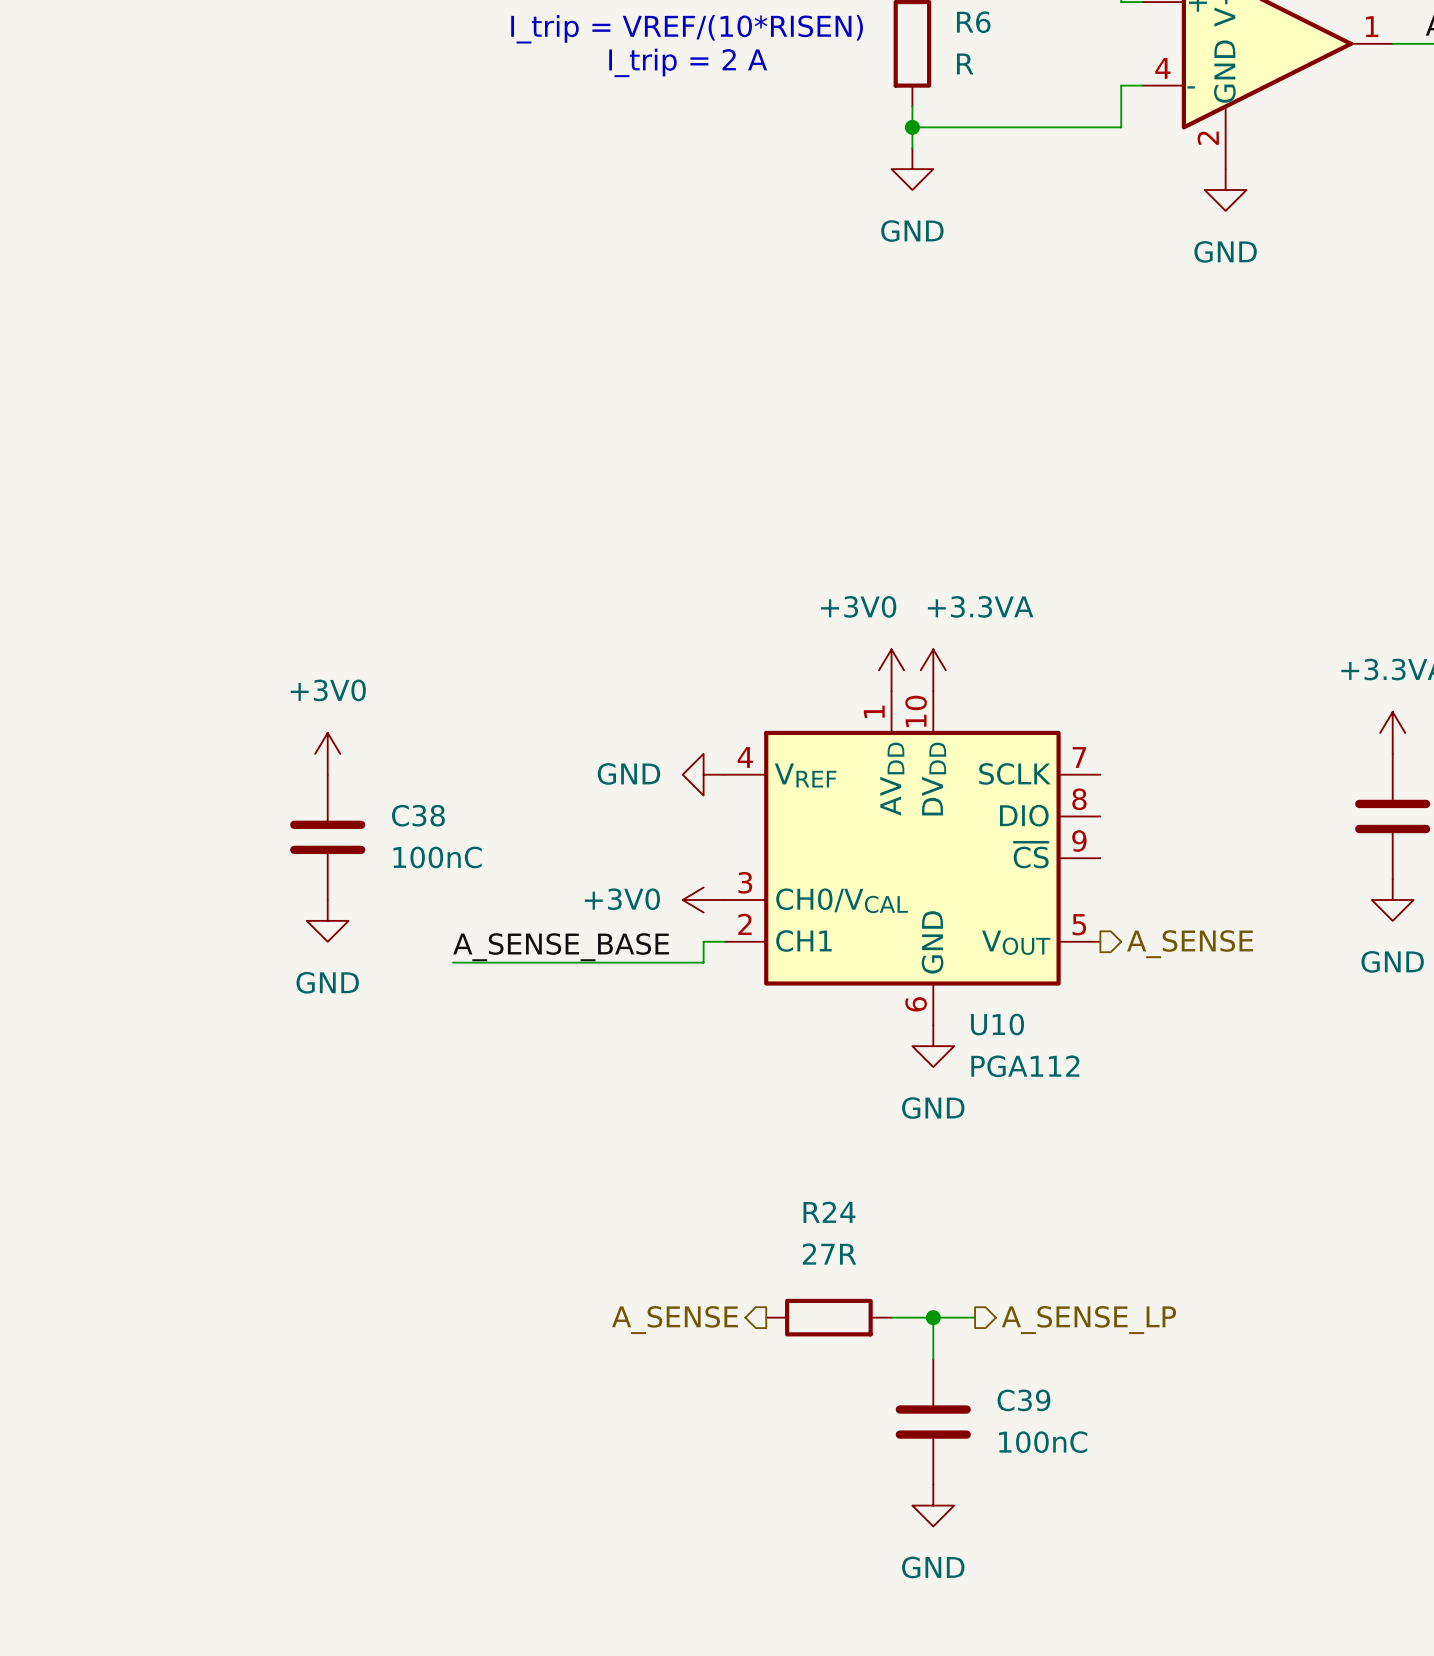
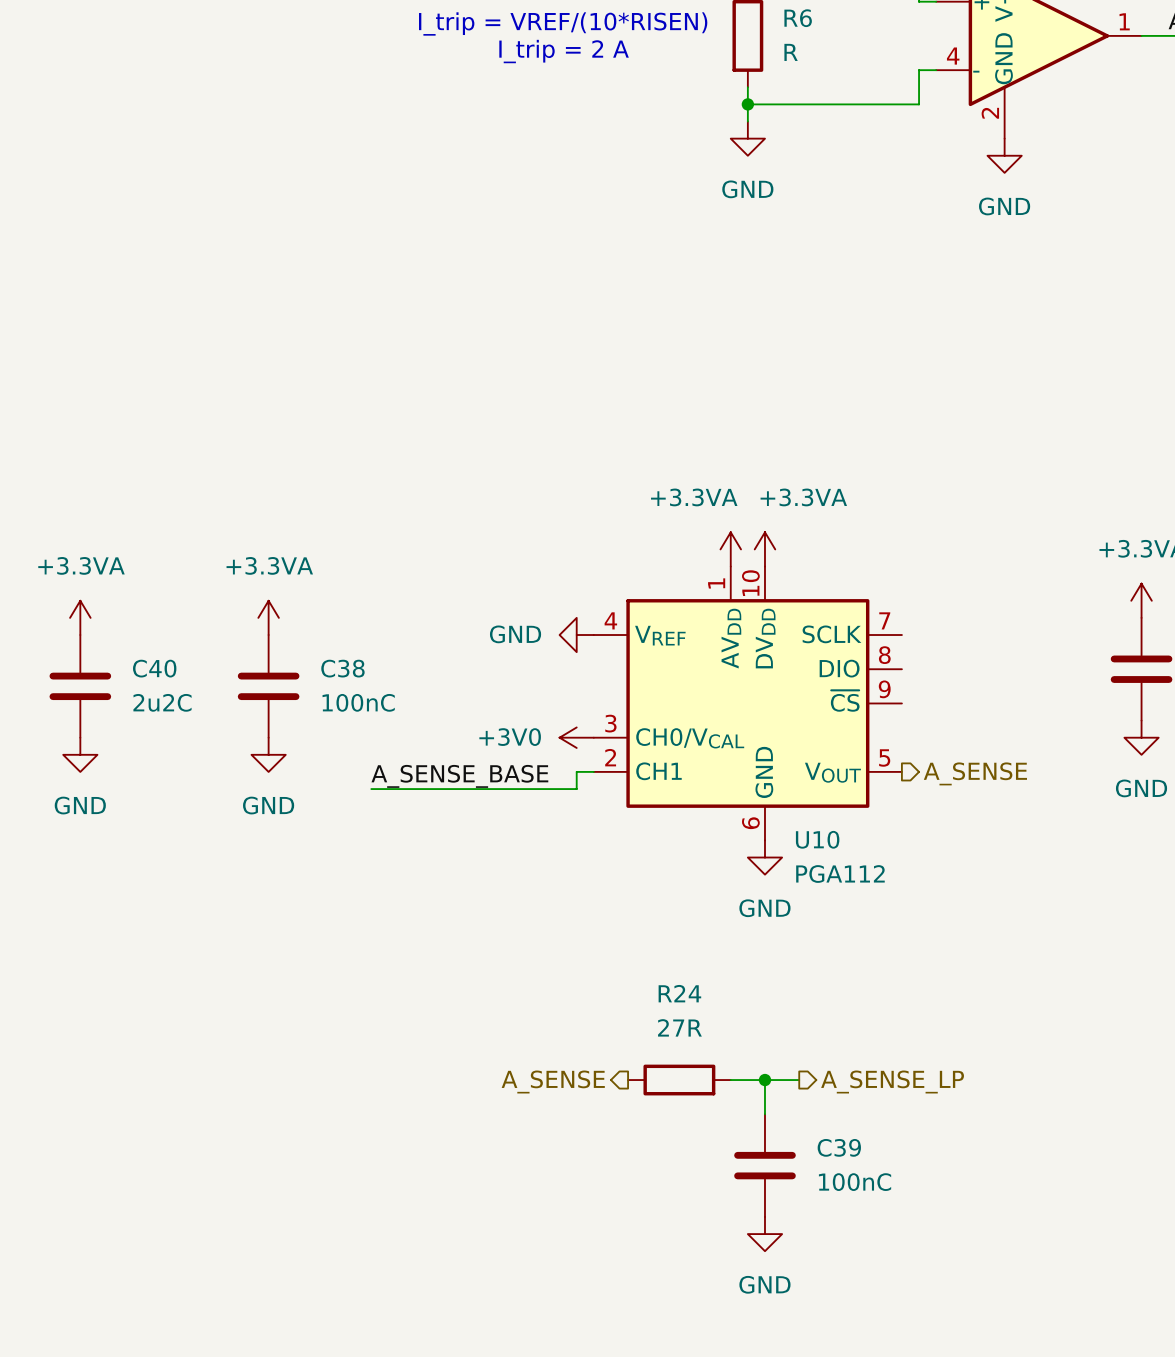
power symbol: +3V0 (891, 670) -> +3.3VA (730, 549)
power symbol: none -> +3.3VA (80, 617)
power symbol: +3V0 (327, 753) -> +3.3VA (268, 617)
C40: none -> 2u2C (80, 686)
power symbol: none -> GND (80, 754)

